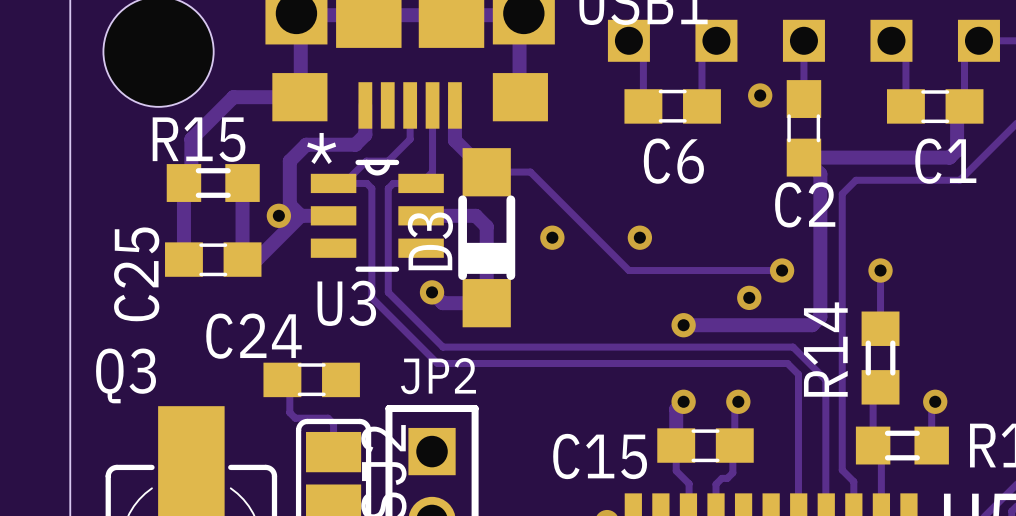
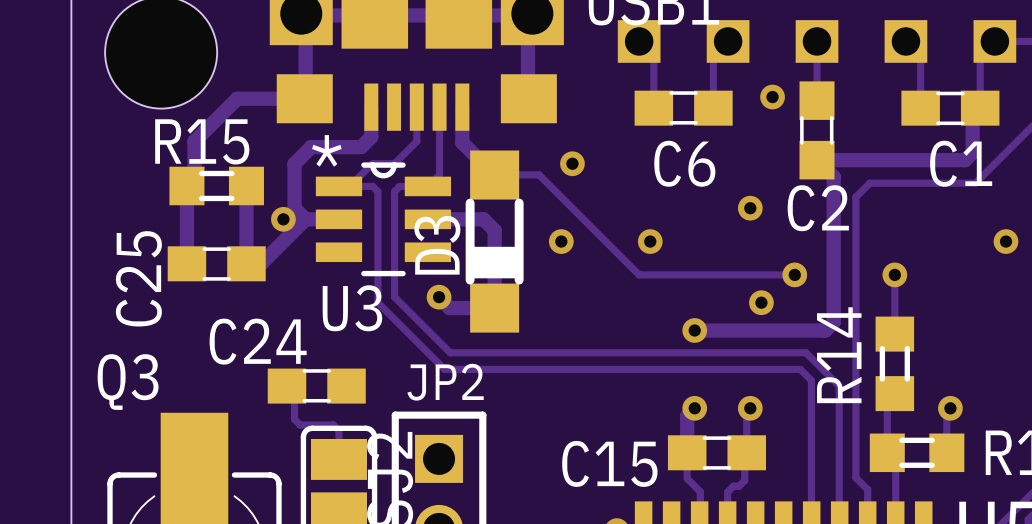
via: none -> (572, 163)
via: none -> (750, 208)
via: none -> (1006, 241)

